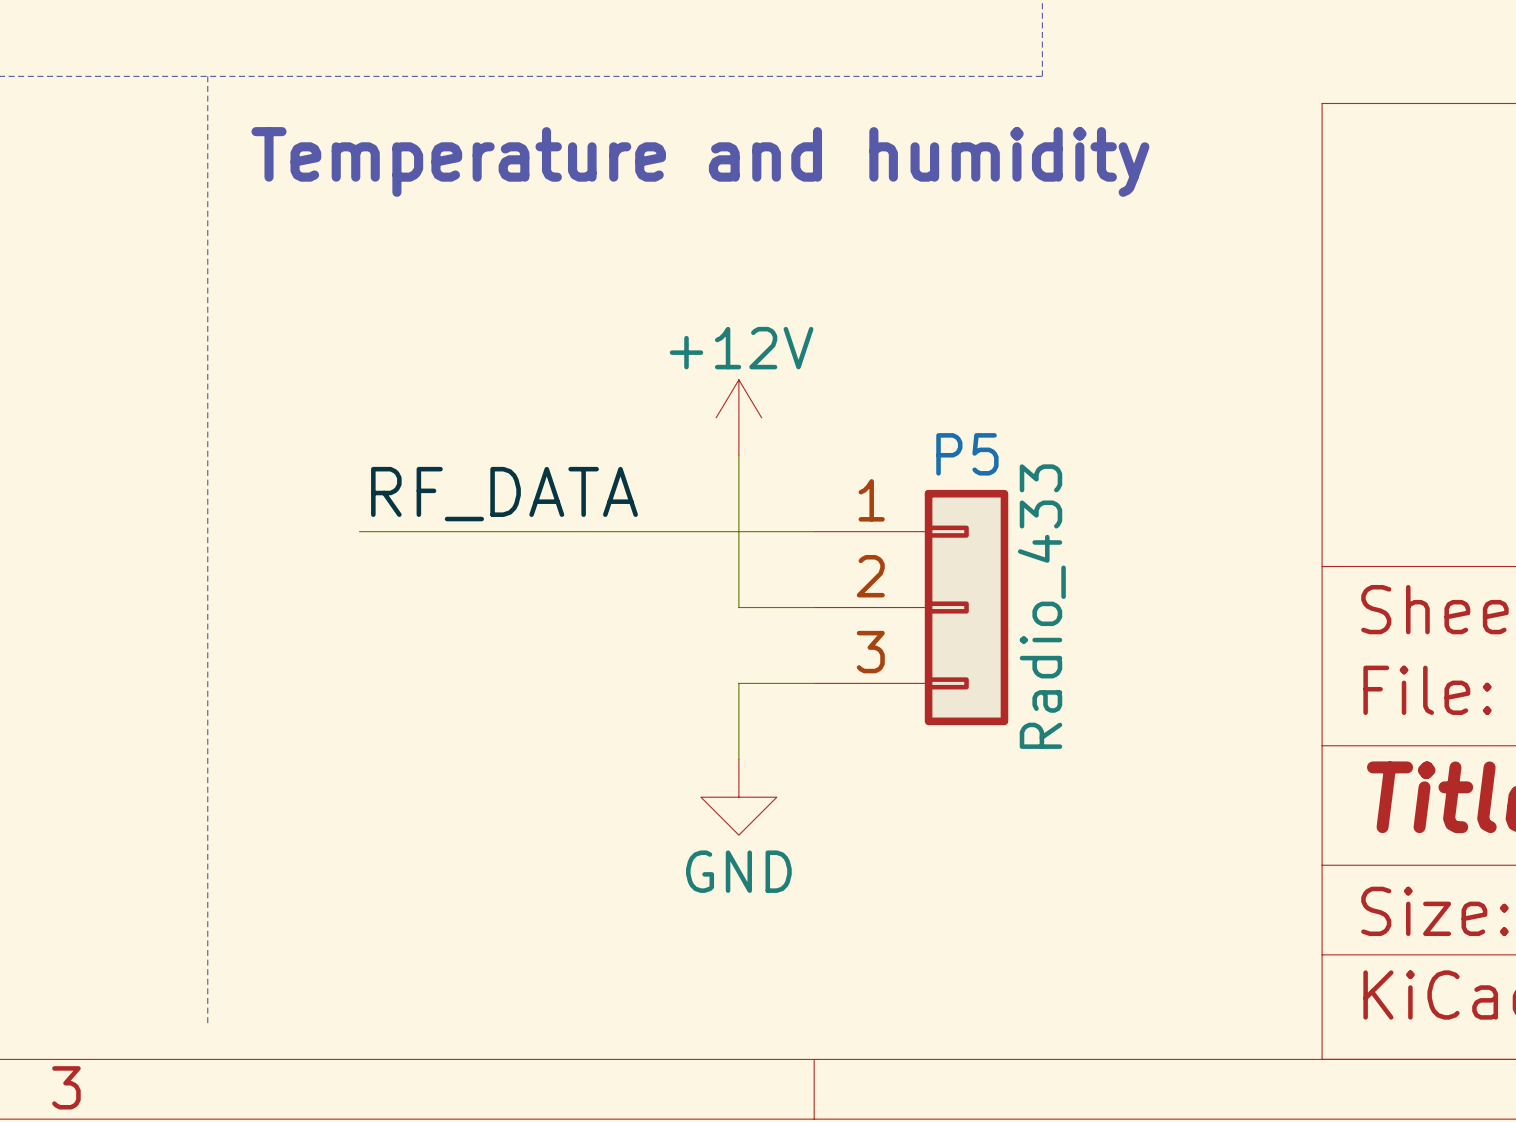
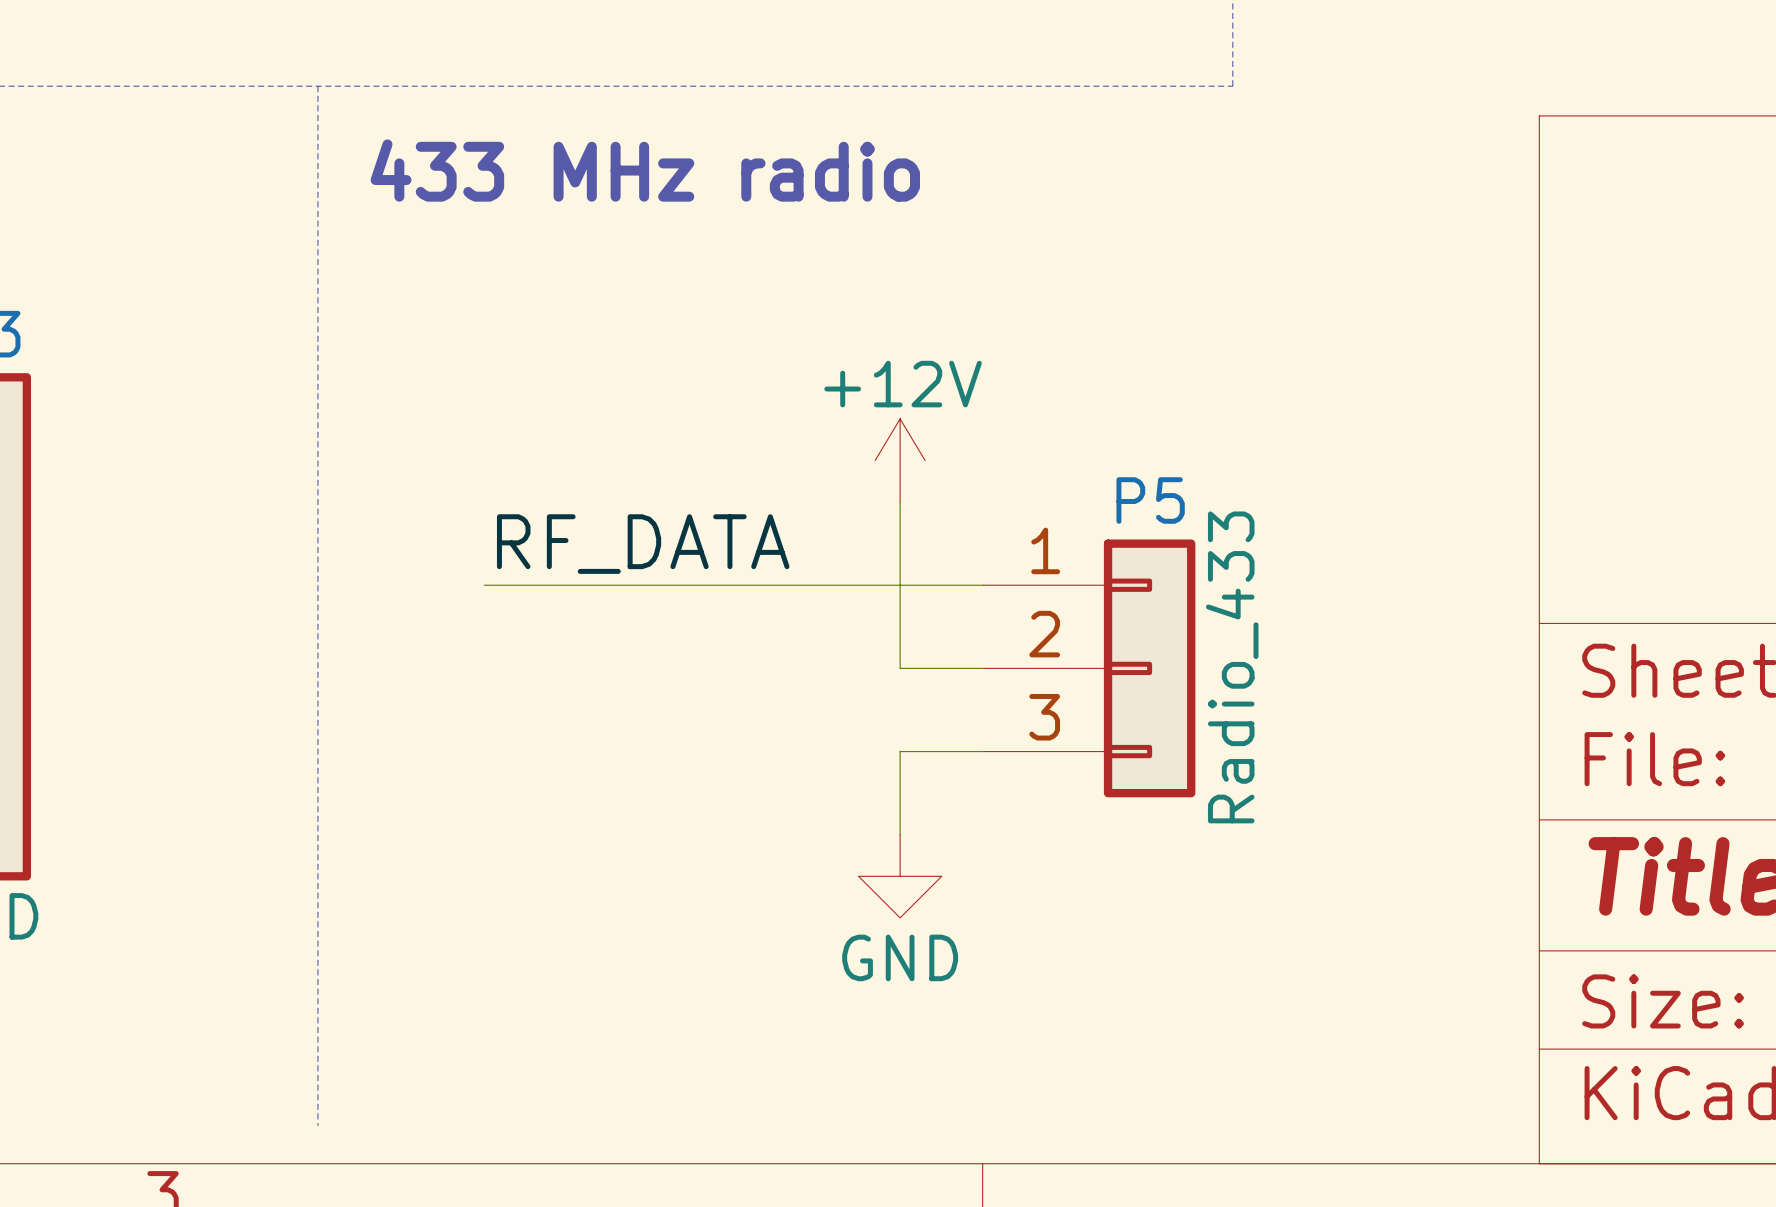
text: Temperature and humidity (700, 161) -> 433 MHz radio (645, 170)

